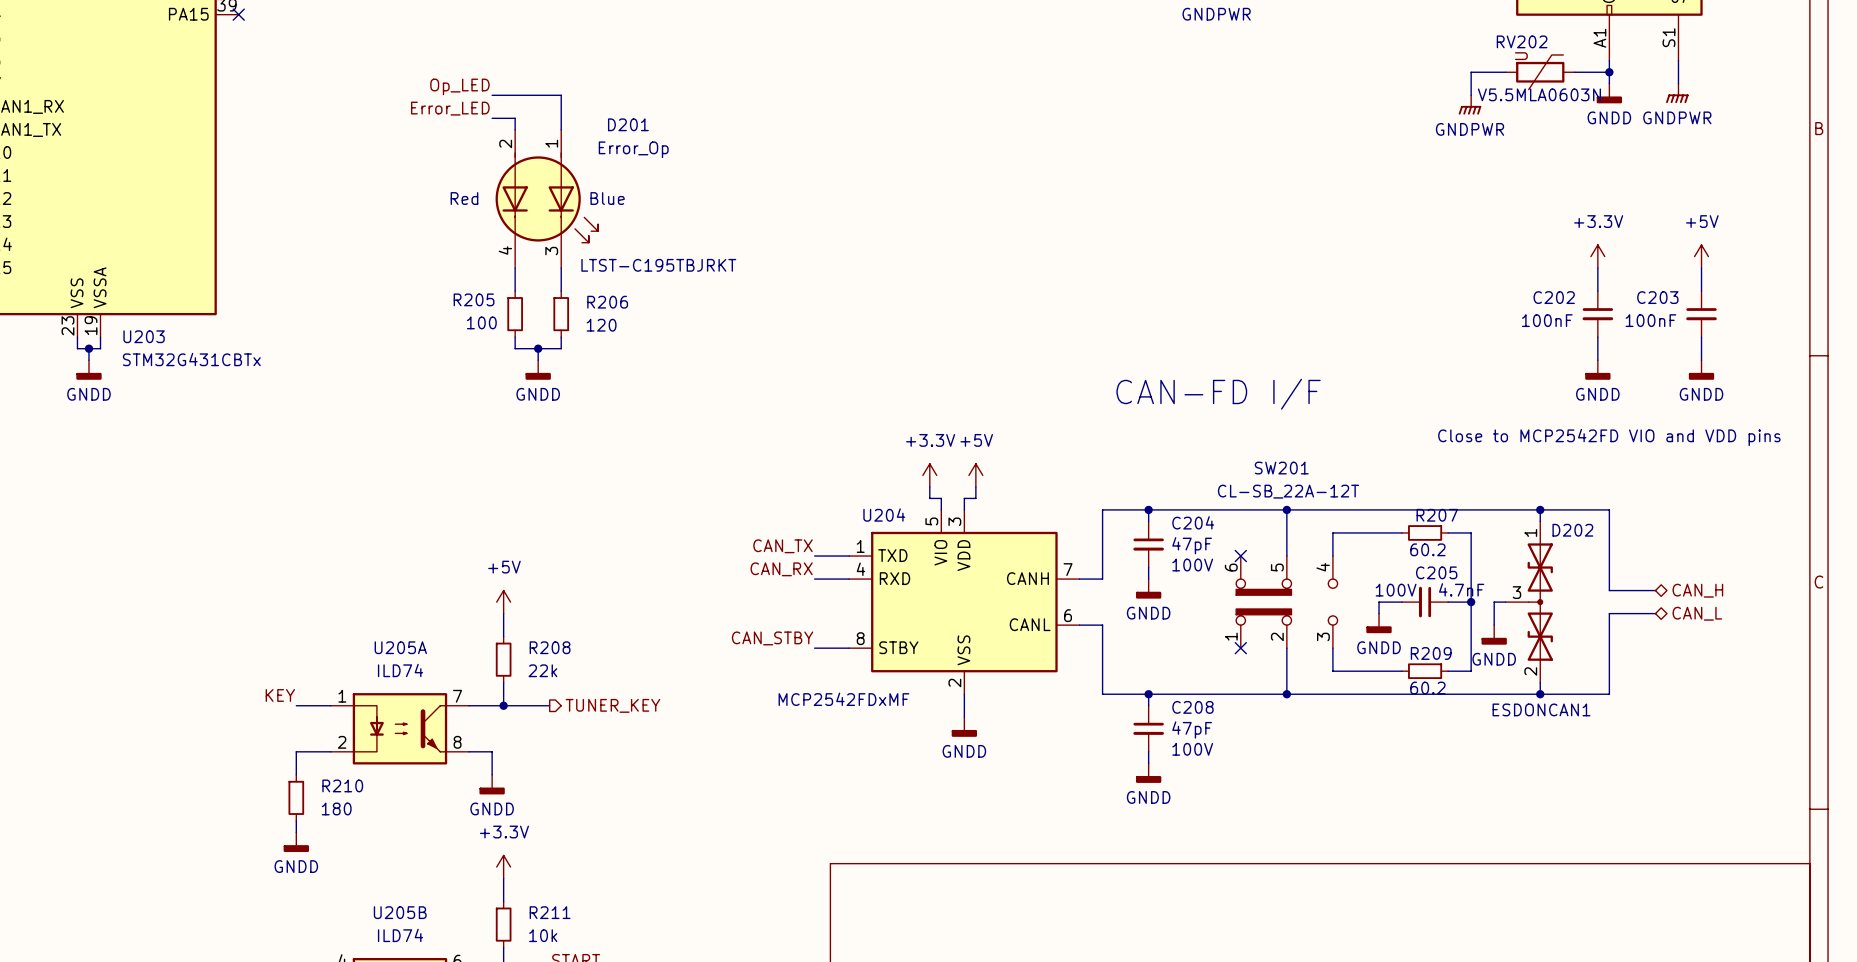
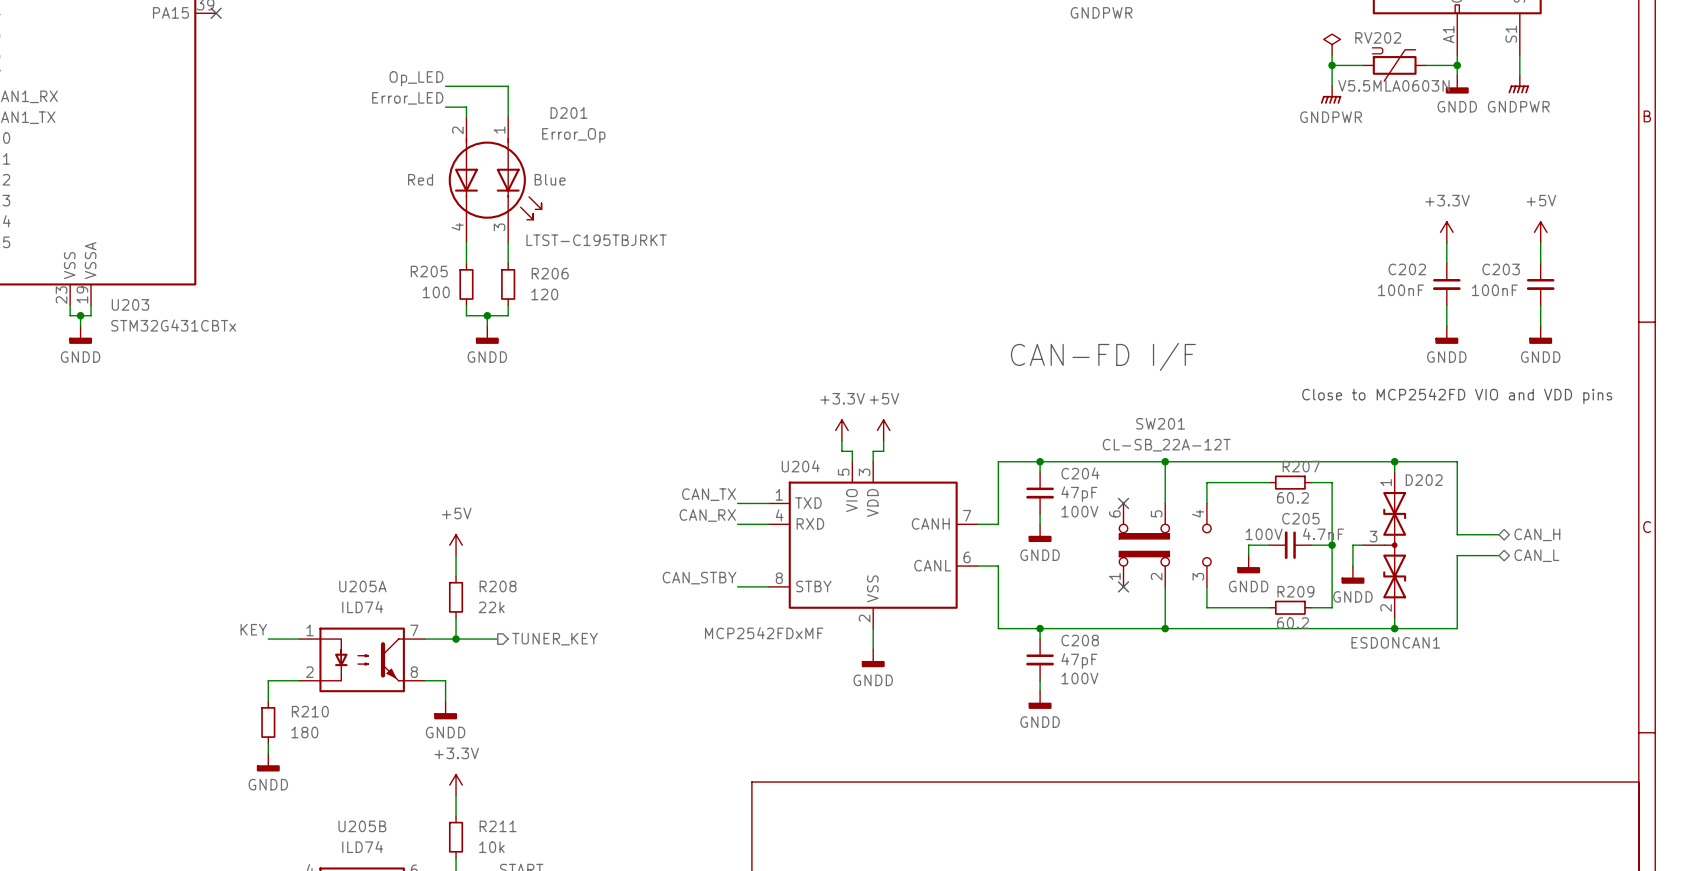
power symbol: none -> (1332, 44)
wire: none -> (1332, 55) (1332, 65)
junction: none -> (1332, 65)

